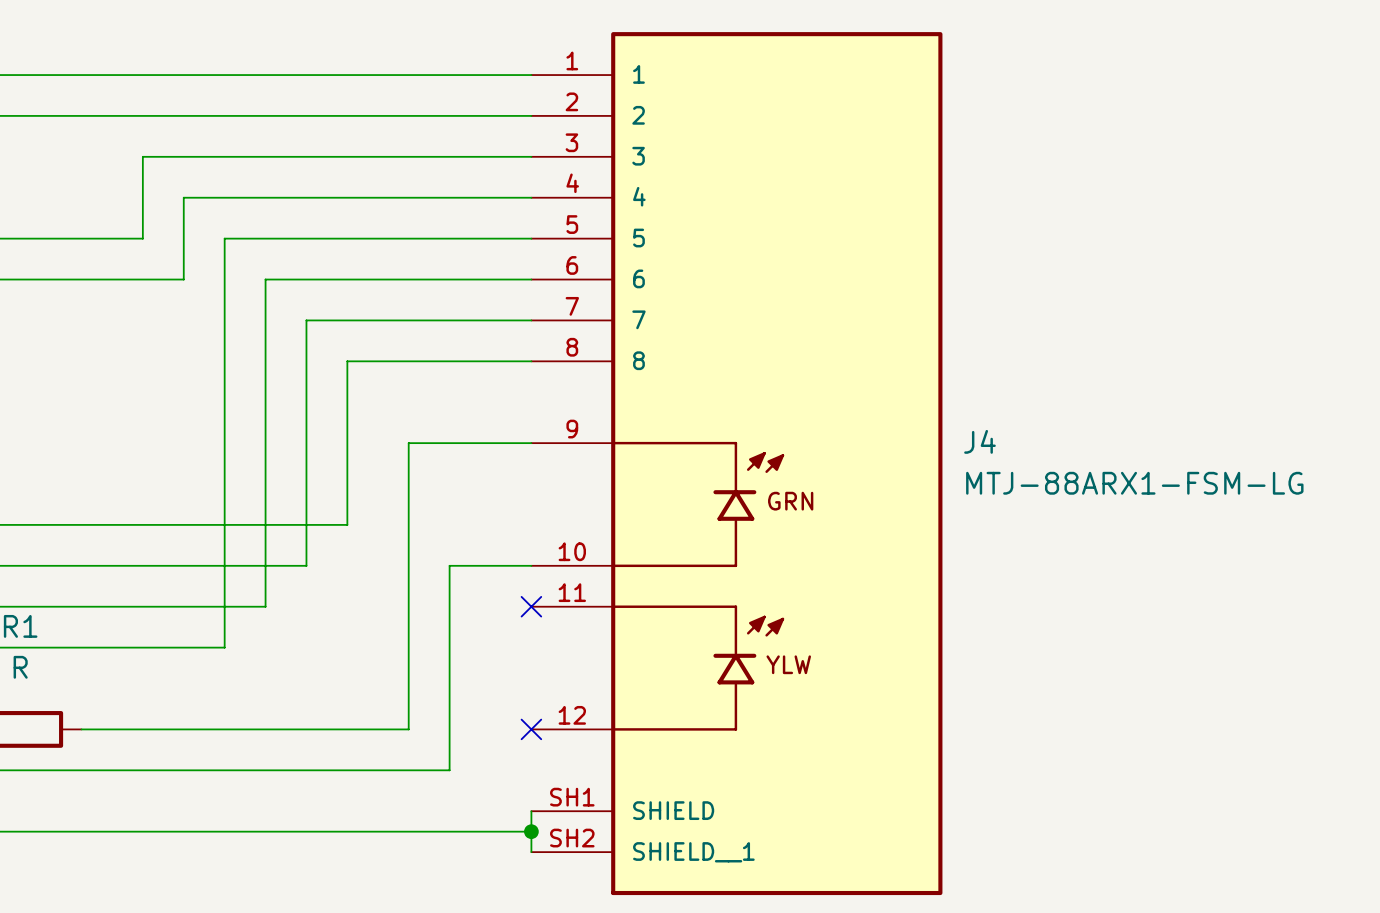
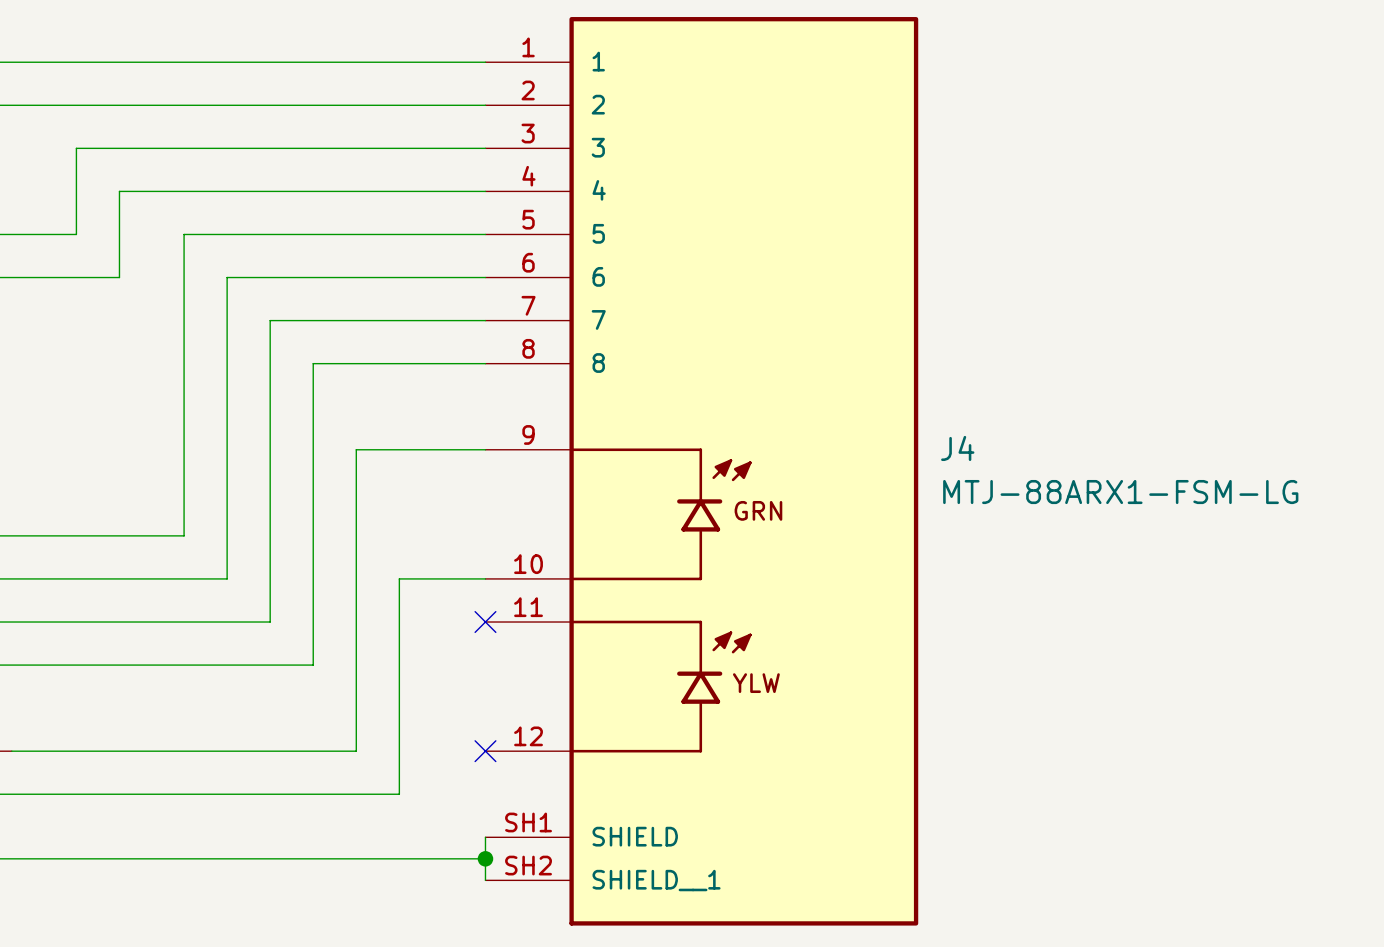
wire: (245, 238) (224, 238) (224, 647) -> (184, 234) (184, 535)
wire: (286, 279) (265, 279) (265, 606) -> (227, 277) (227, 578)
wire: (326, 320) (306, 320) (306, 565) (286, 565) -> (270, 320) (270, 622) (205, 622)
wire: (367, 361) (347, 361) (347, 524) (245, 524) -> (313, 363) (313, 665) (162, 665)

